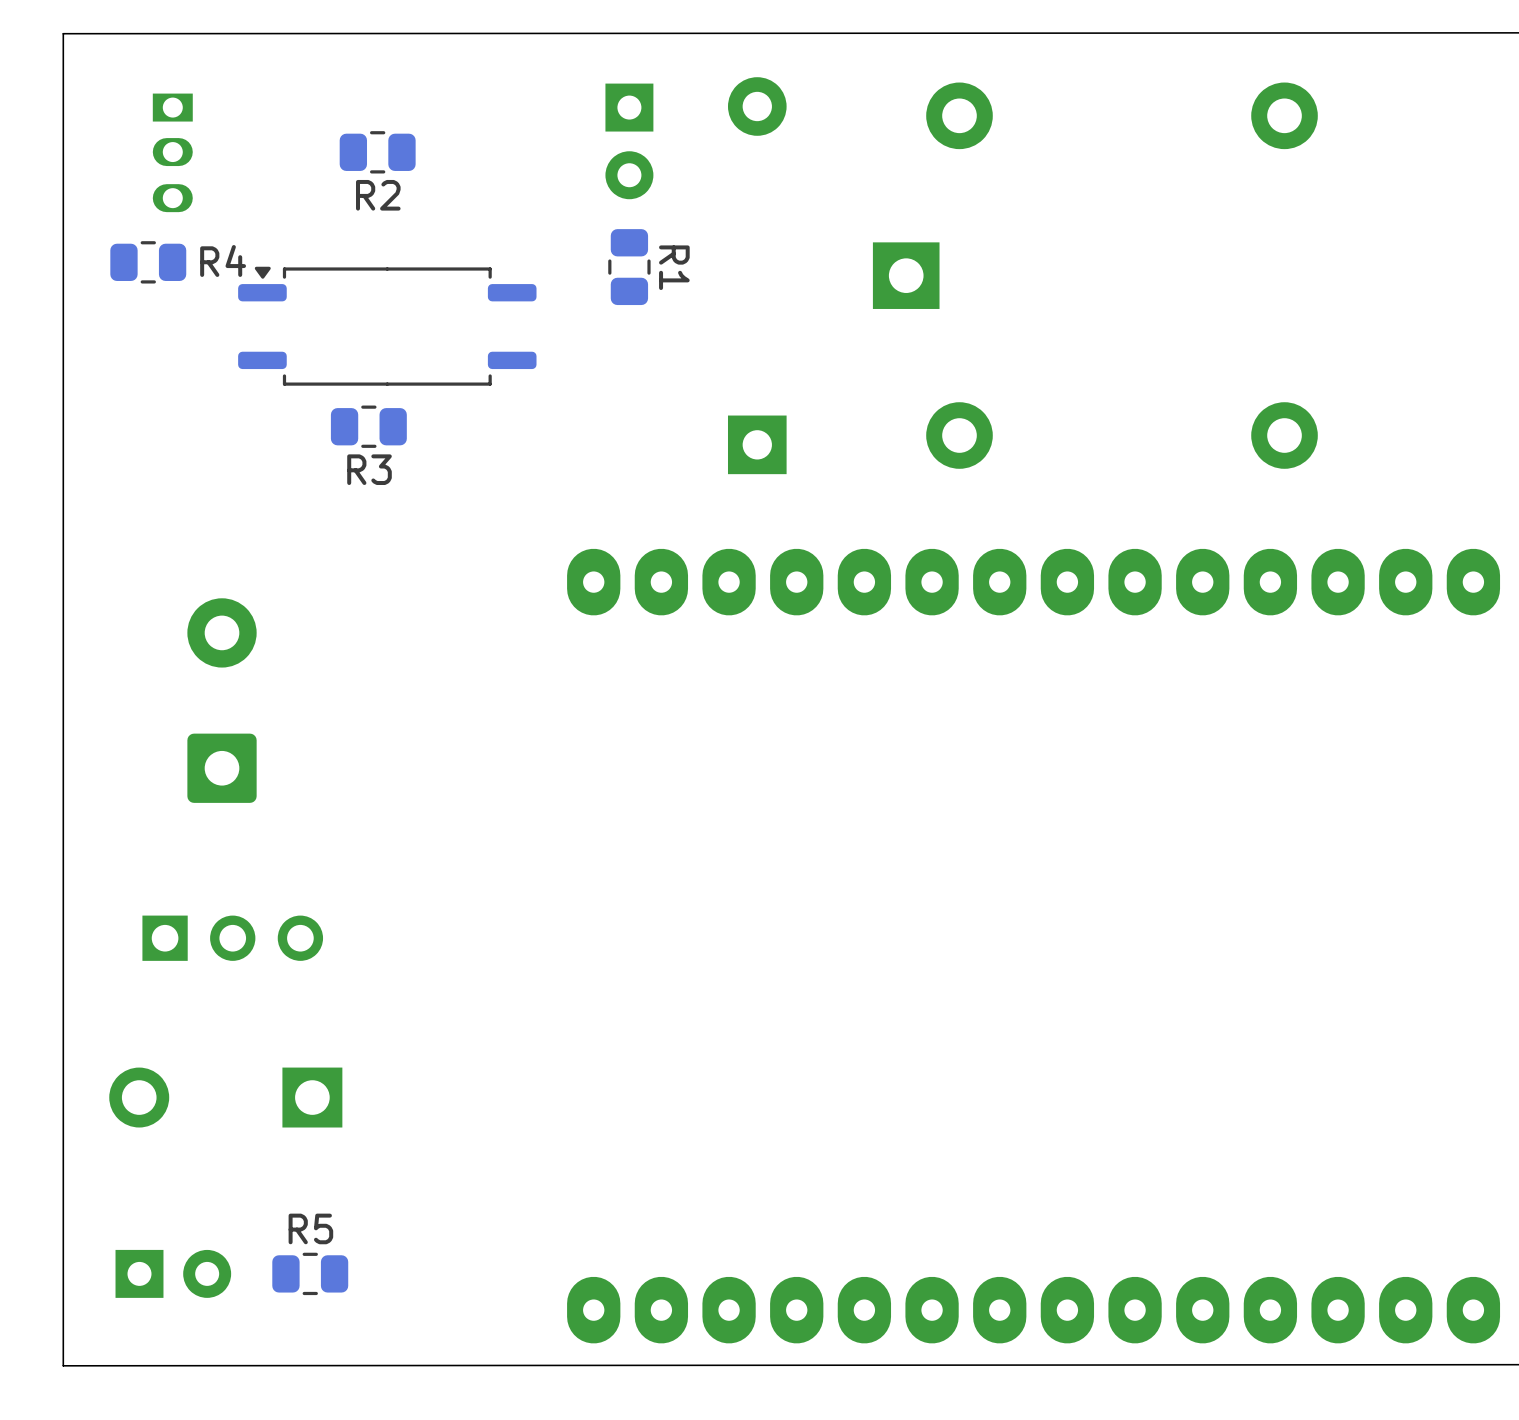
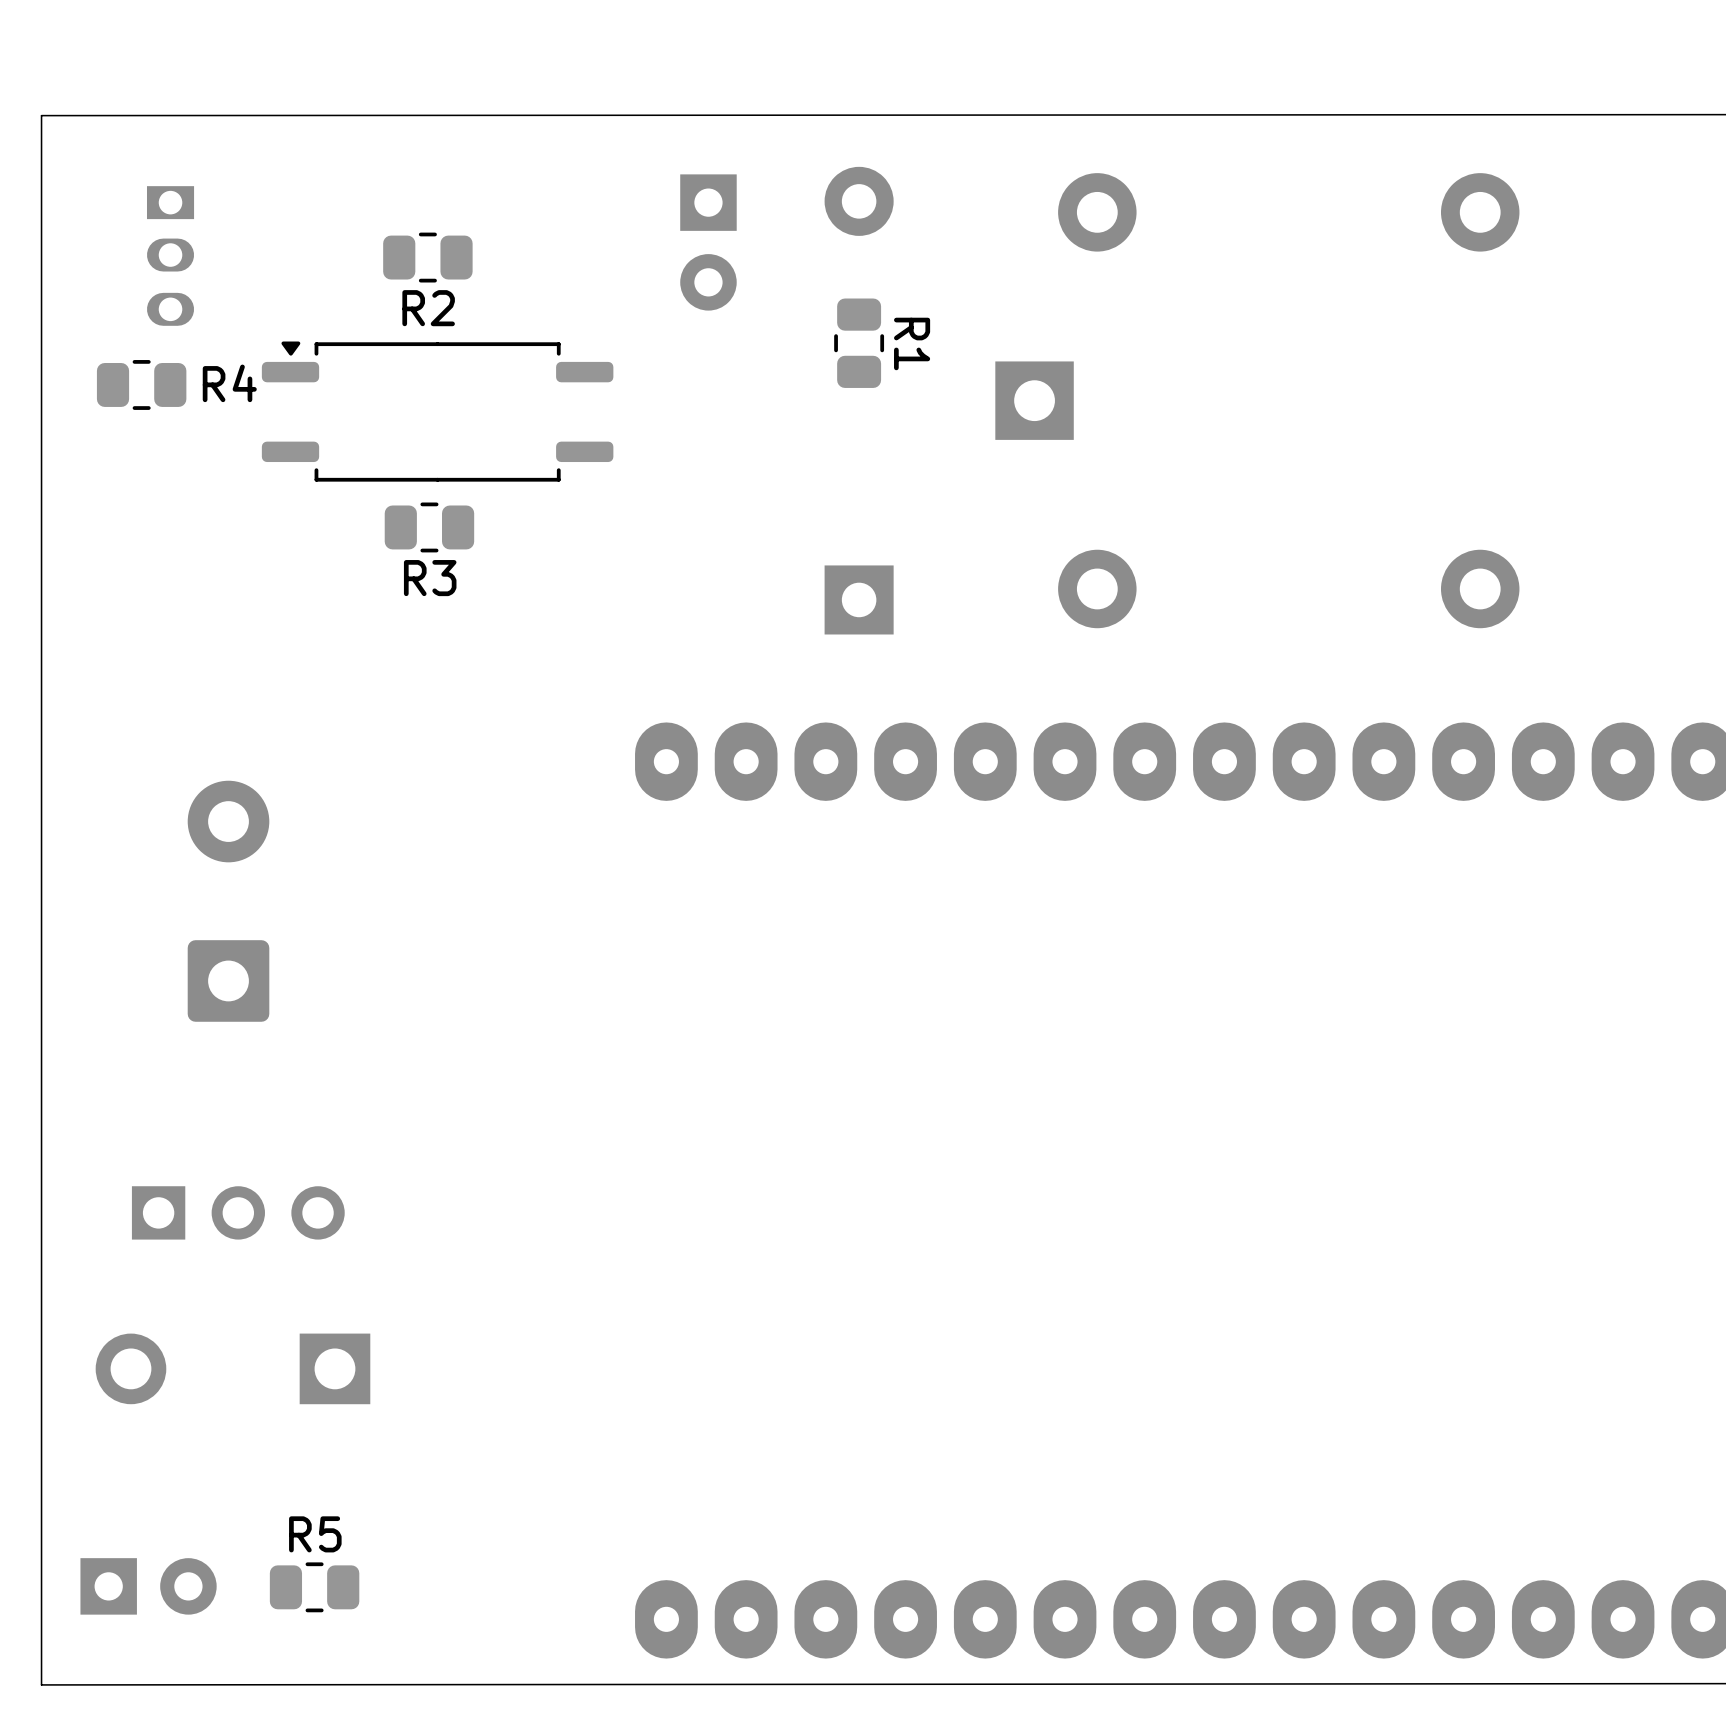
R2 position: (377, 152) -> (427, 257)
R1 position: (629, 267) -> (859, 343)
part position: (387, 326) -> (437, 411)
R3 position: (368, 426) -> (429, 527)
part position: (232, 938) -> (238, 1212)
part position: (173, 1273) -> (148, 1586)
R5 position: (310, 1273) -> (314, 1587)

